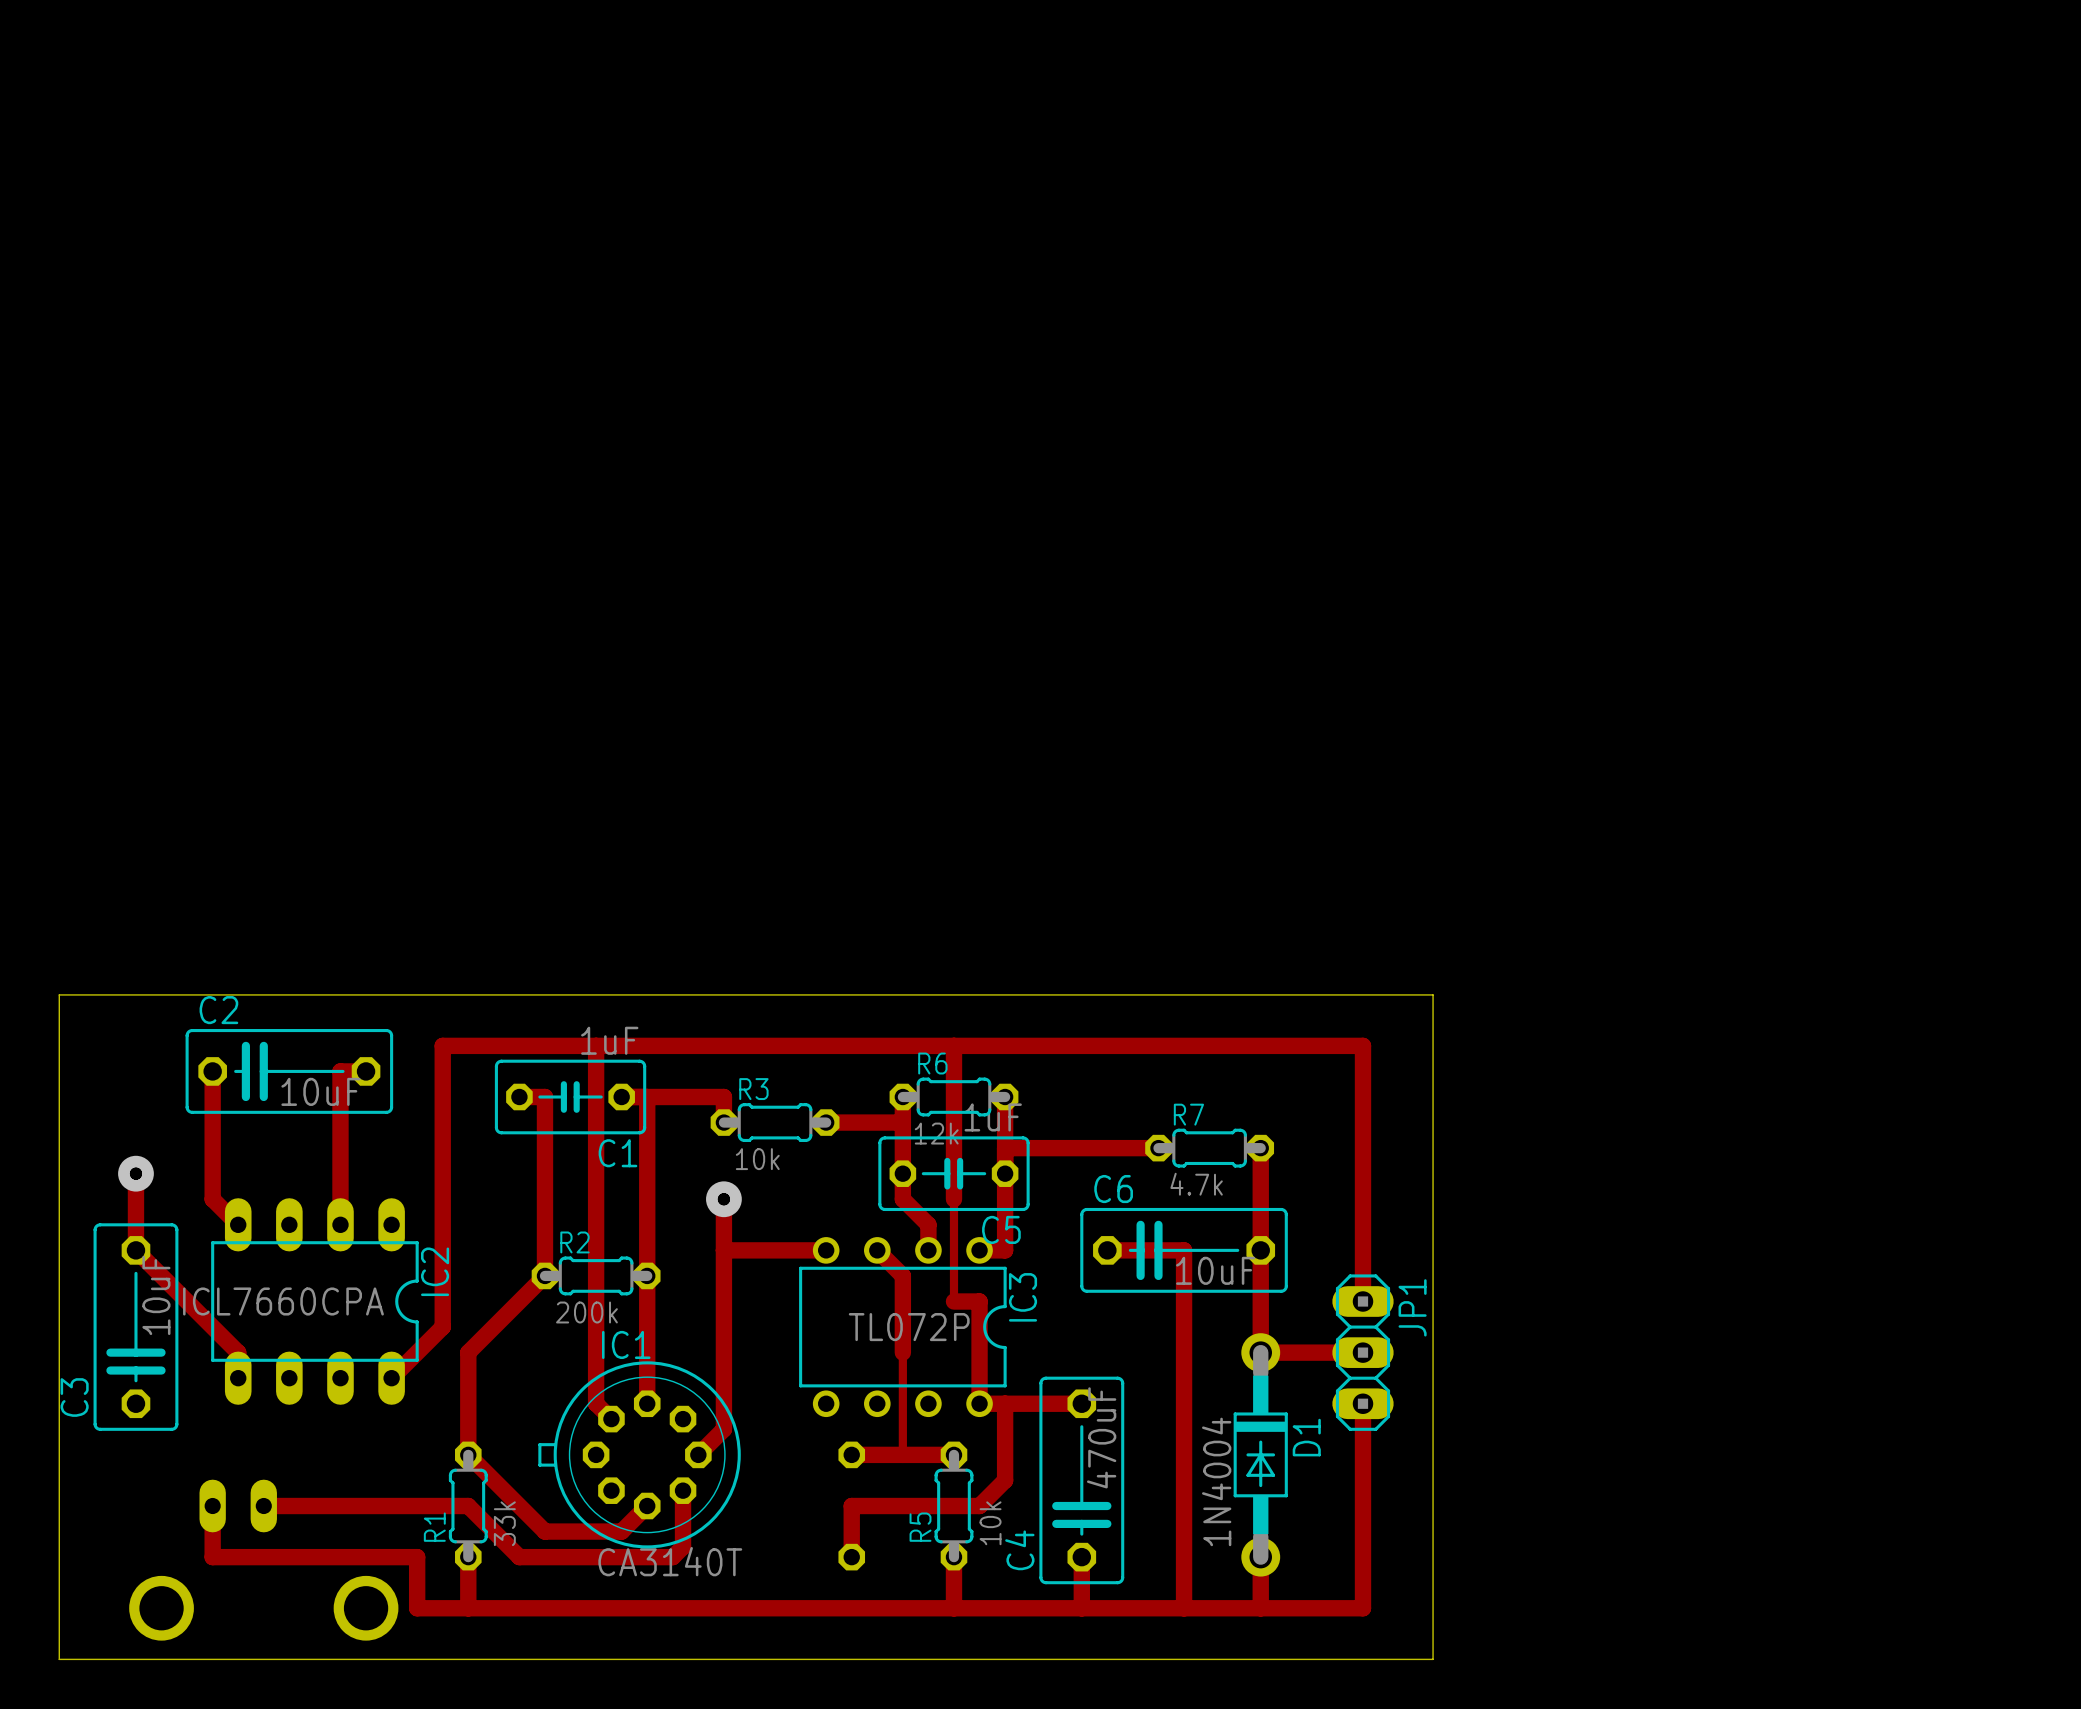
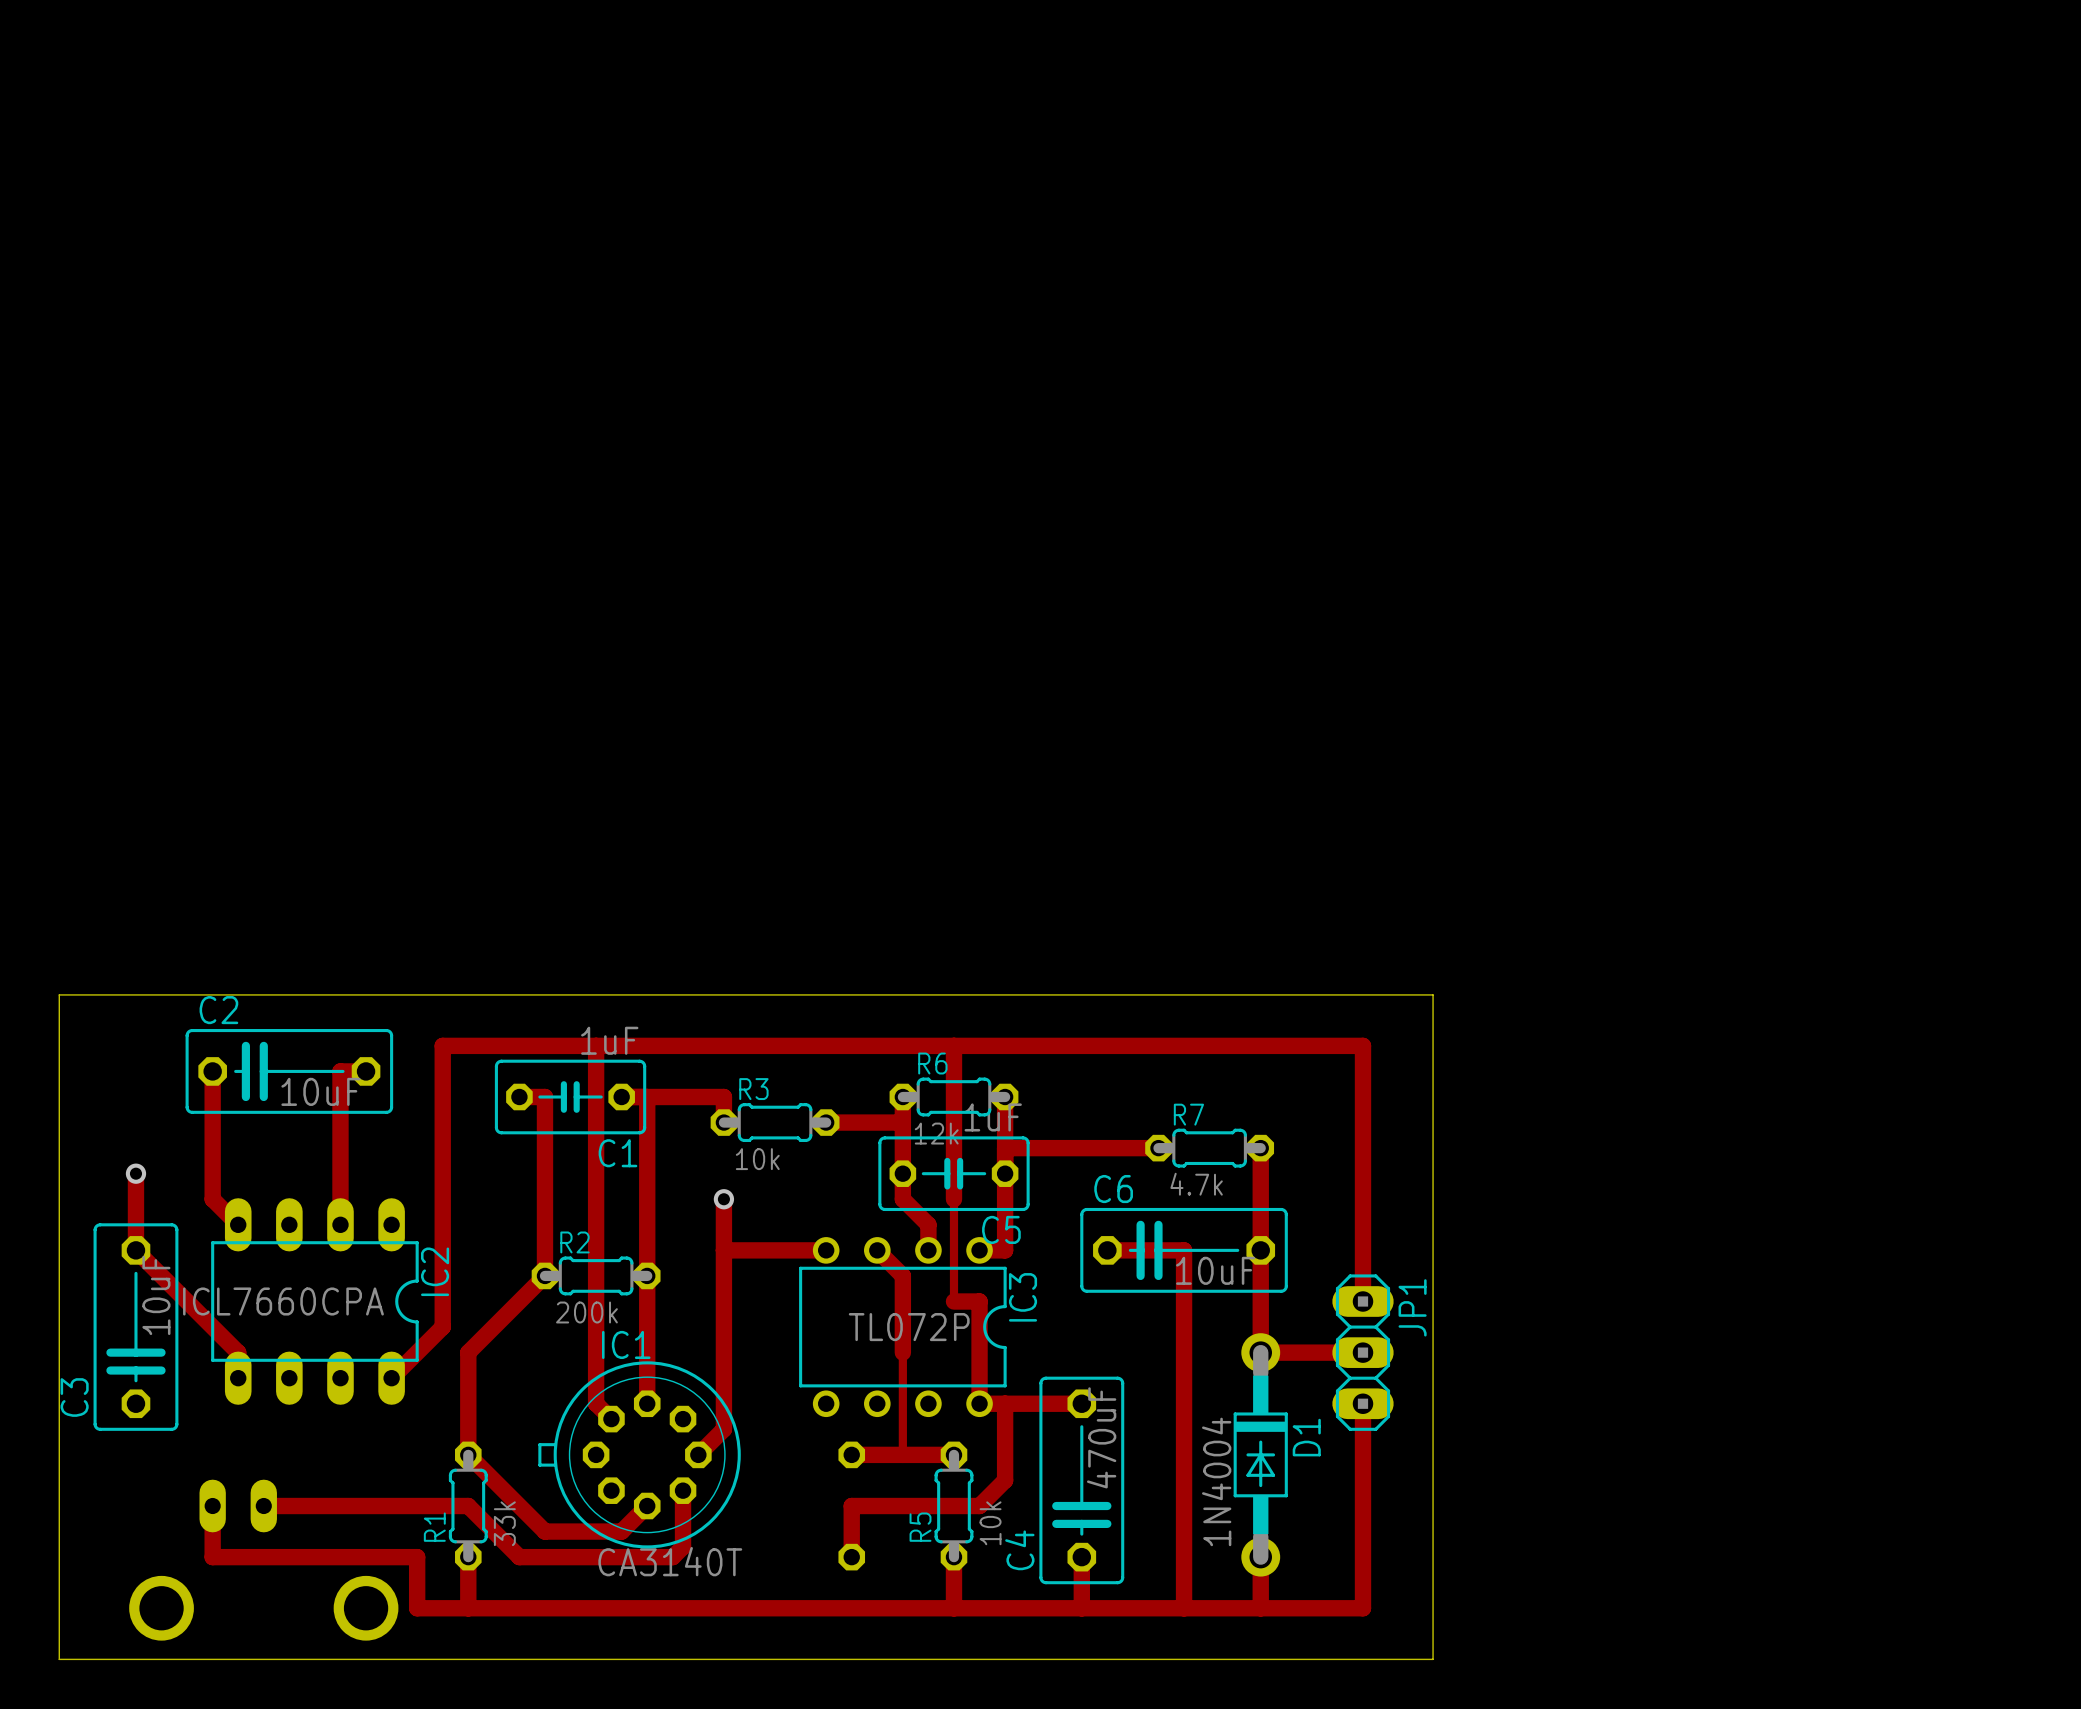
via: (135, 1173) -> none
via: (723, 1199) -> none

